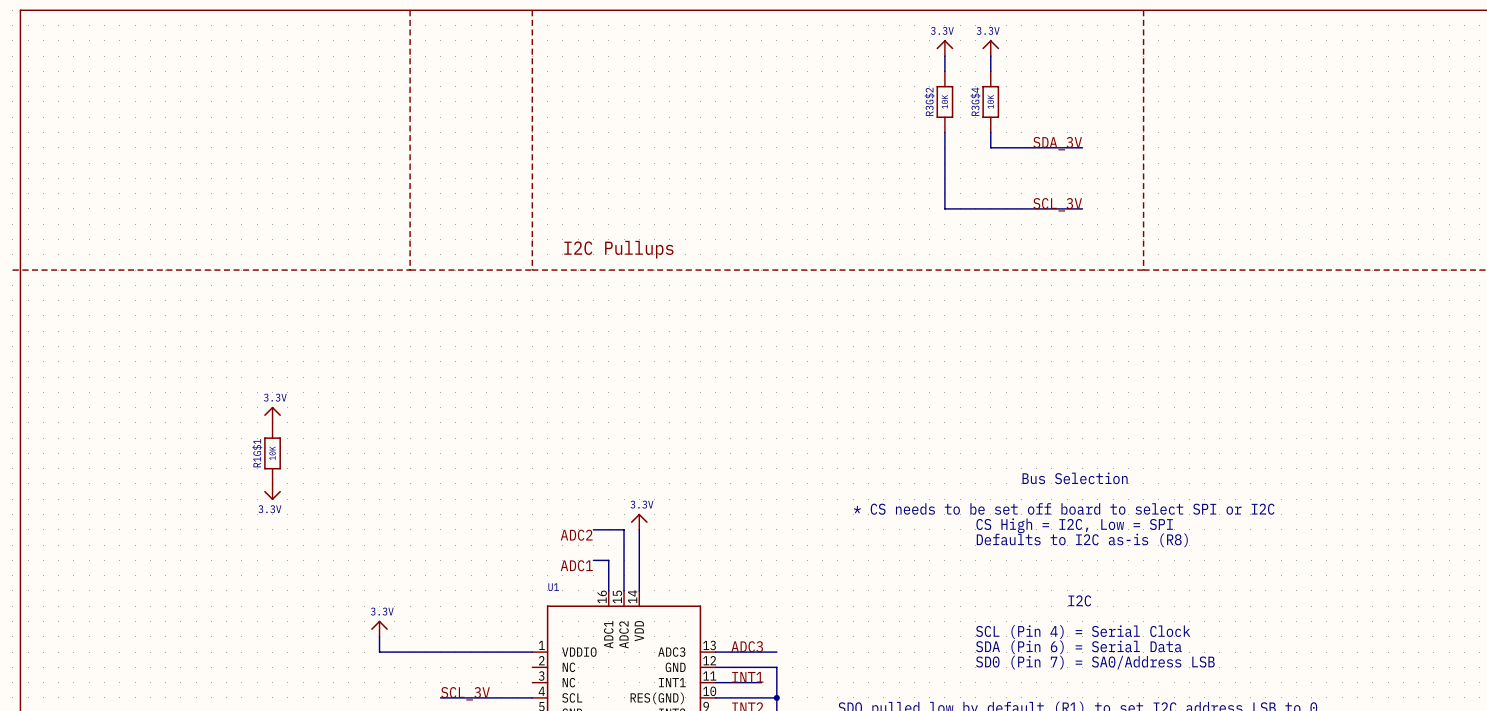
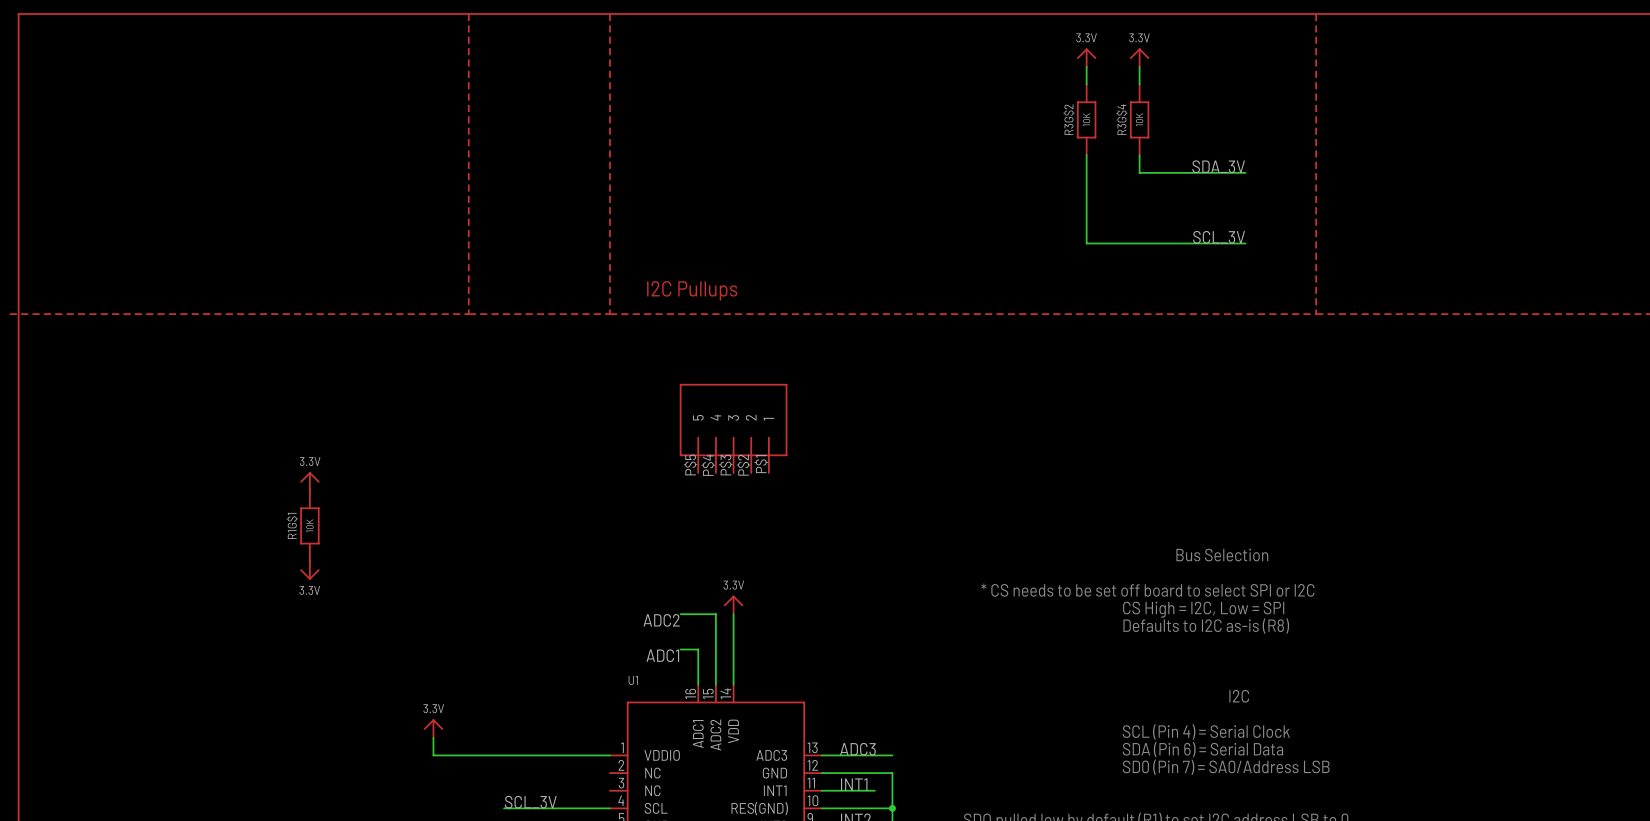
part: none -> (733, 428)

